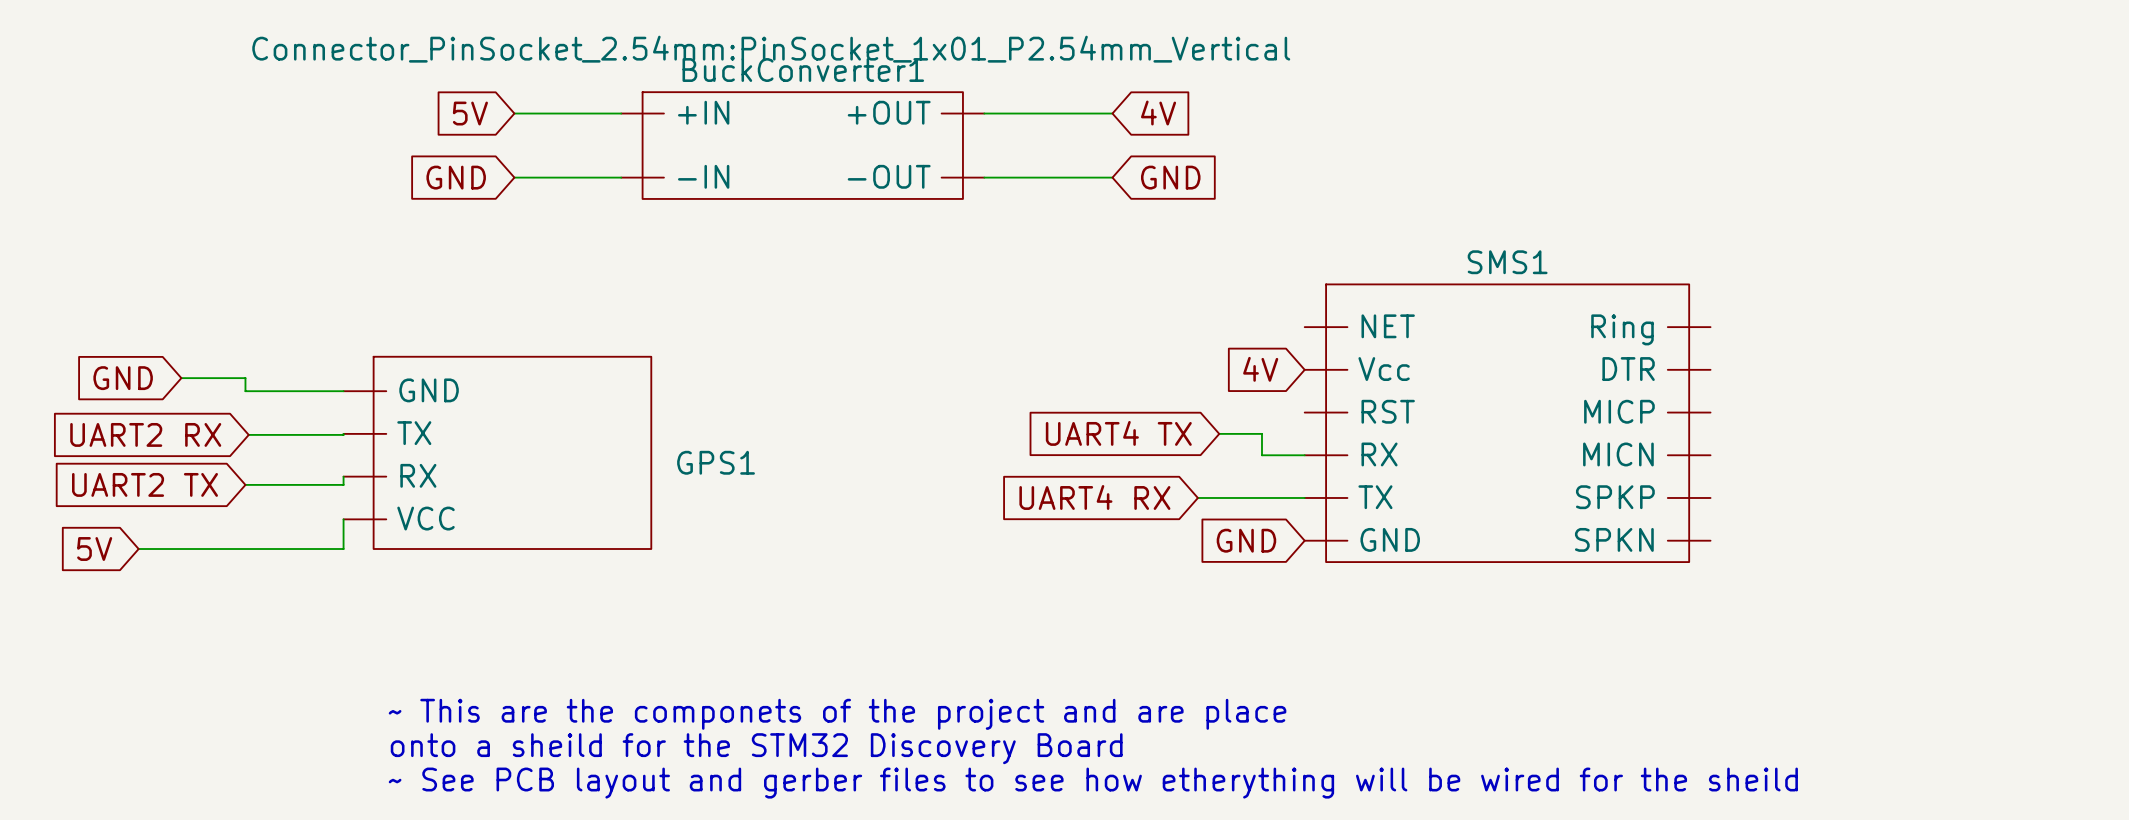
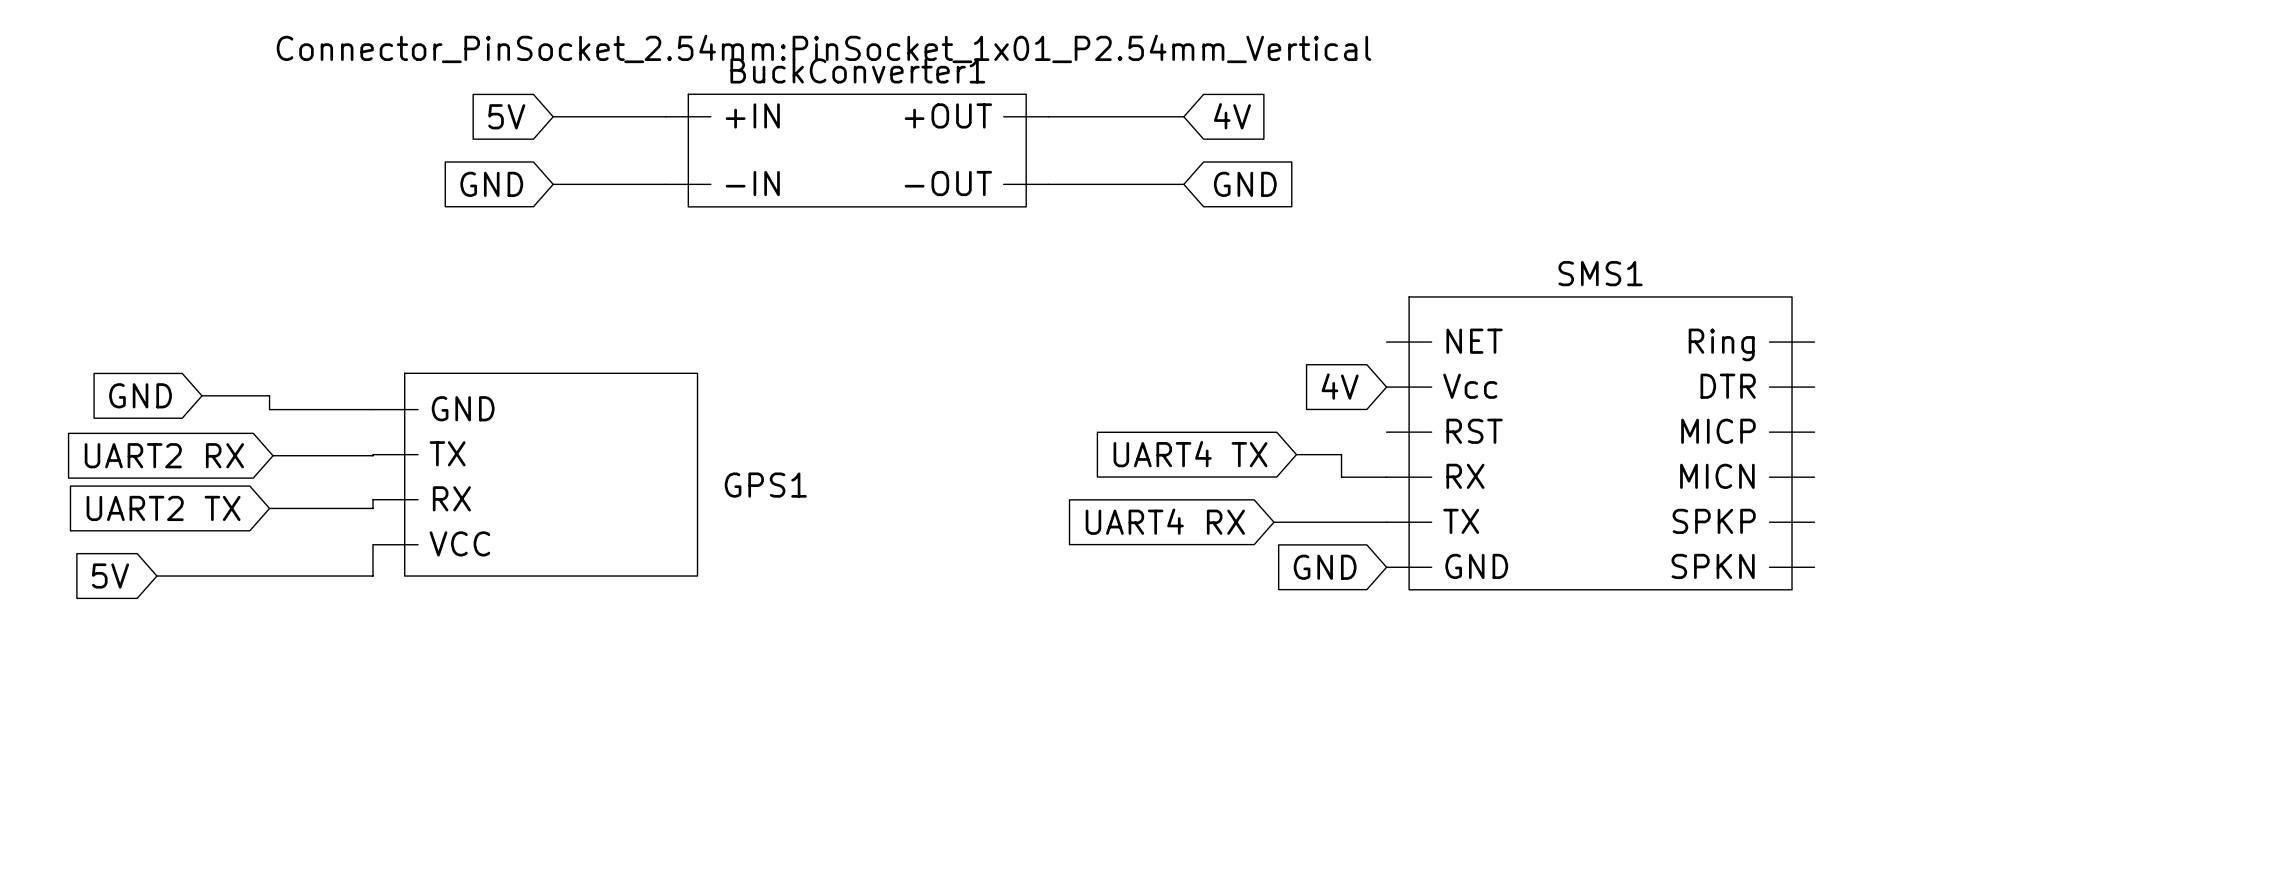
text: ~ This are the componets of the project and are place (837, 714) -> none
text: onto a sheild for the STM32 Discovery Board (756, 748) -> none
text: ~ See PCB layout and gerber files to see how etherything will be wired for the sheild (1093, 783) -> none

